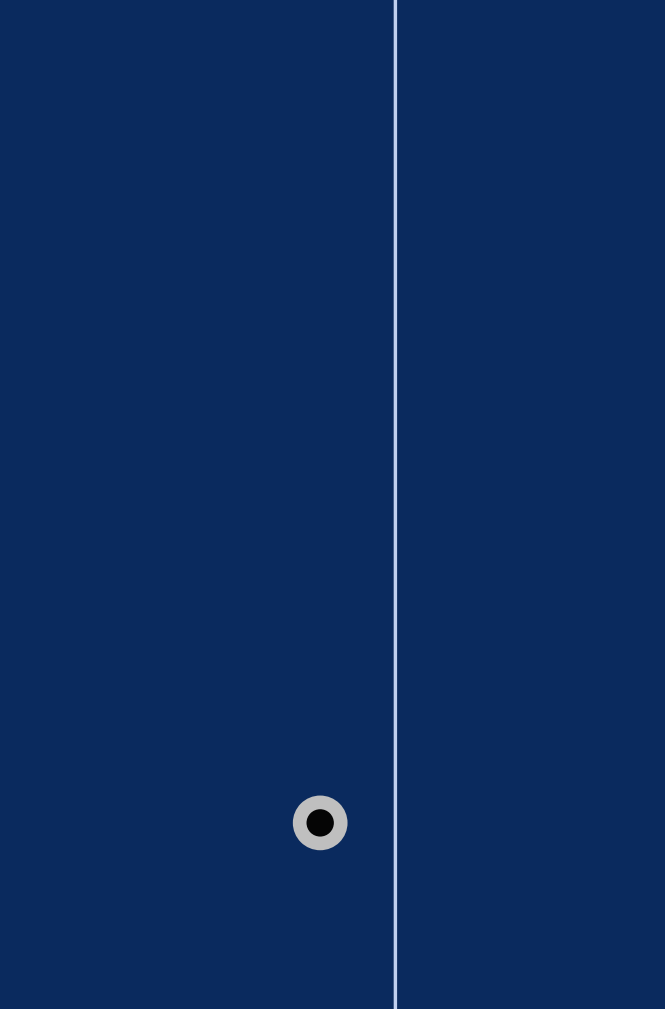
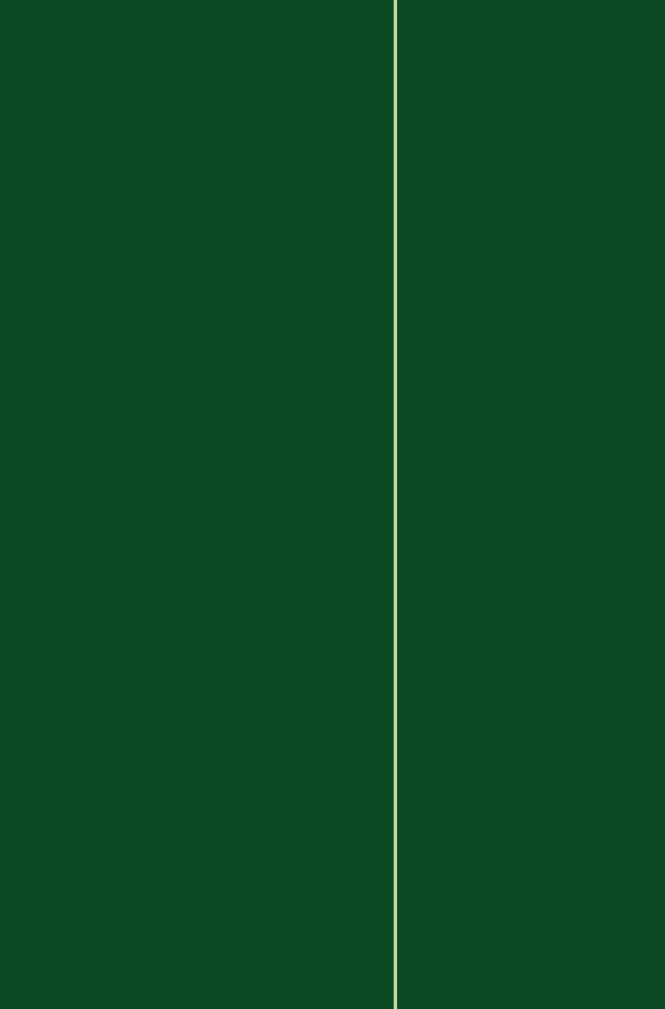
via: (320, 822) -> none

